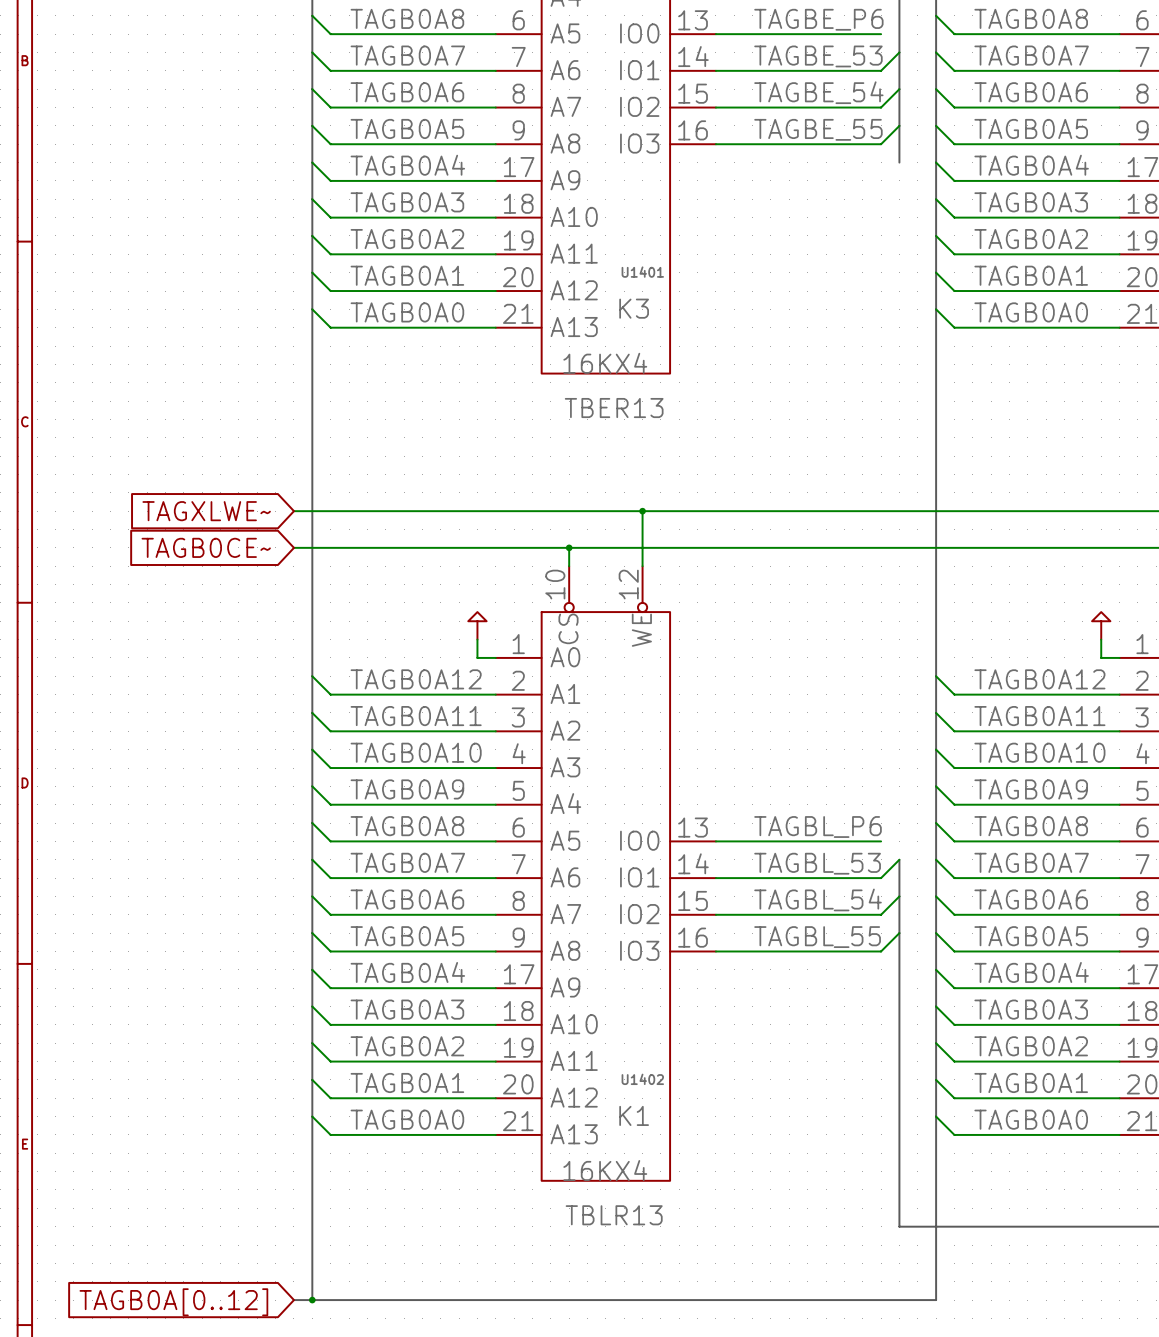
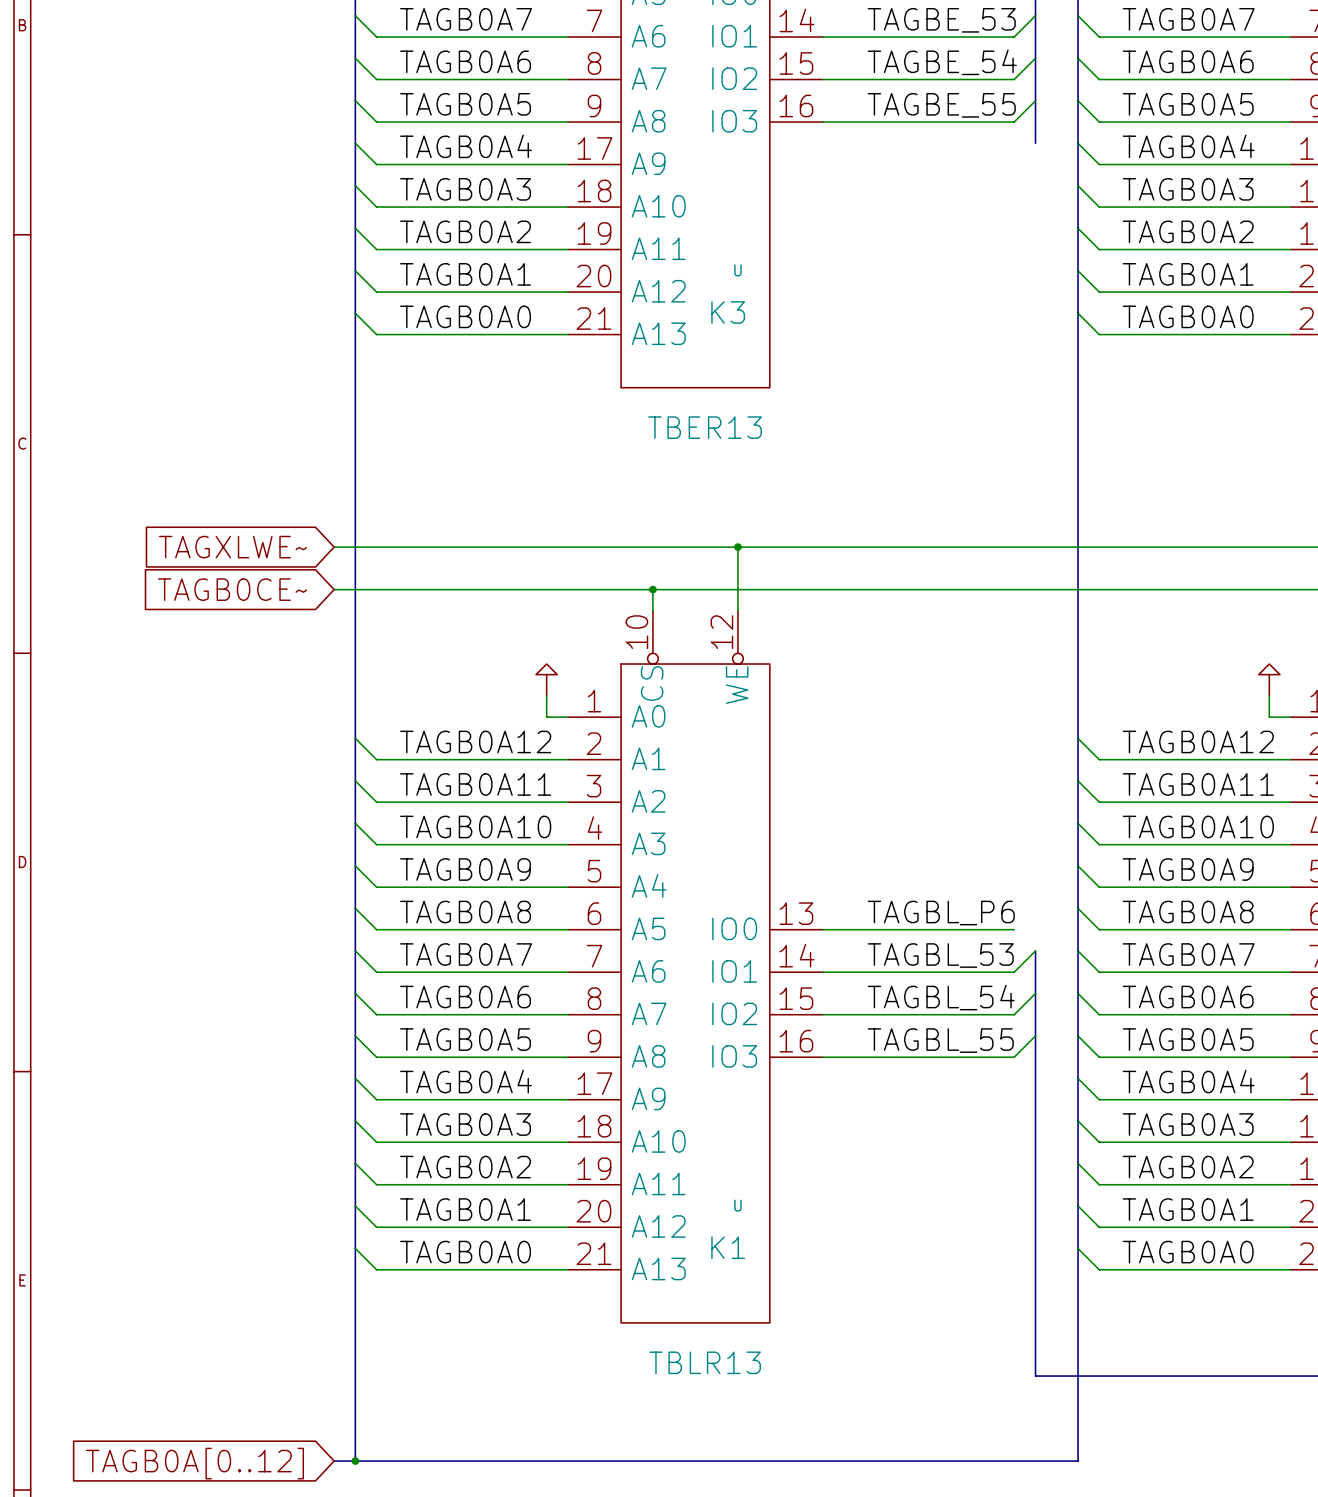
U1401 name: U1401 (642, 272) -> U (737, 270)
U1401 value: 16KX4 (605, 363) -> none
U1402 name: U1402 (642, 1079) -> U (737, 1205)
U1402 value: 16KX4 (605, 1170) -> none

